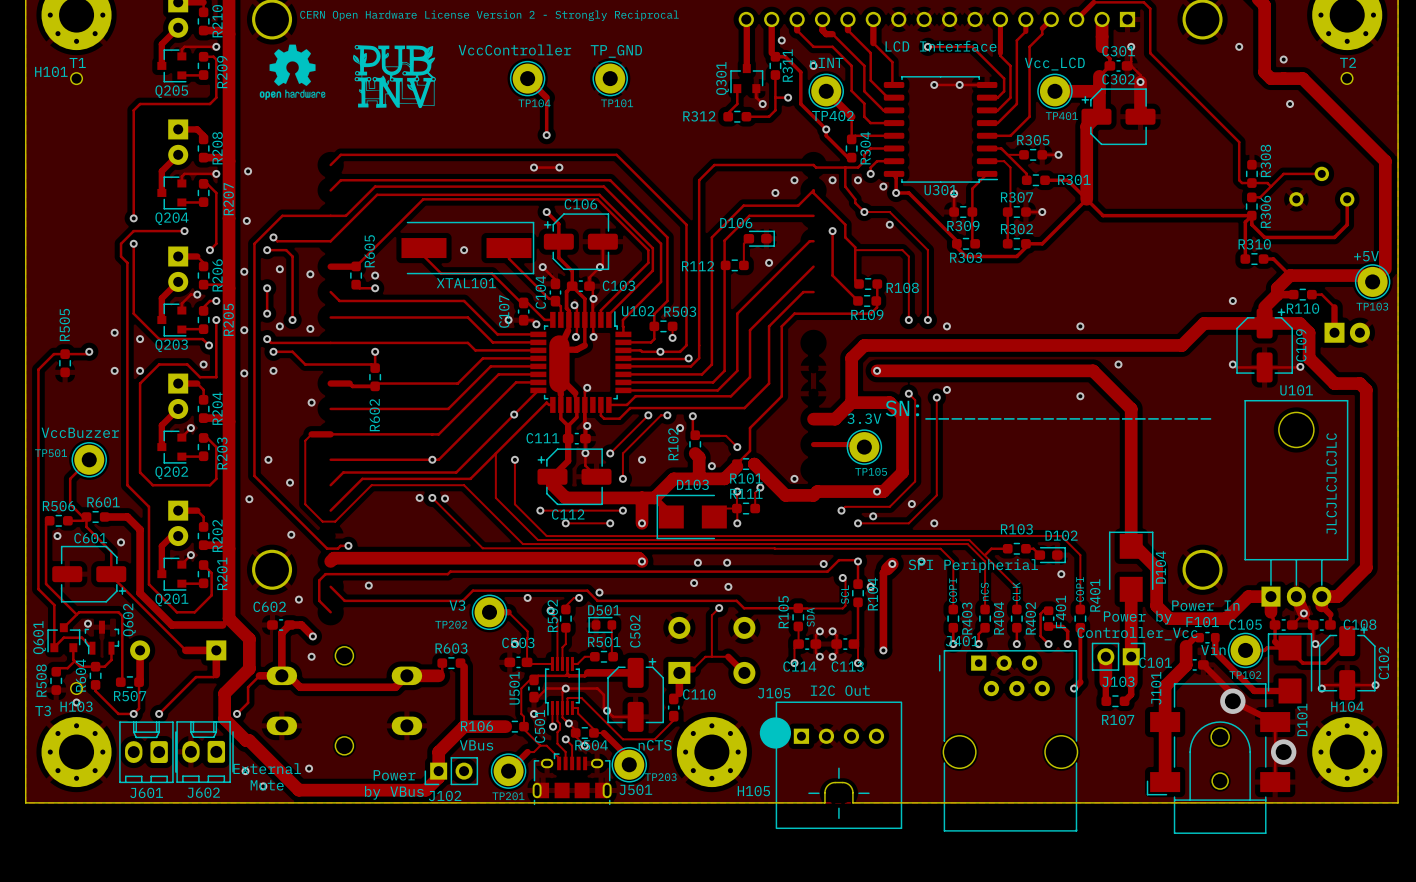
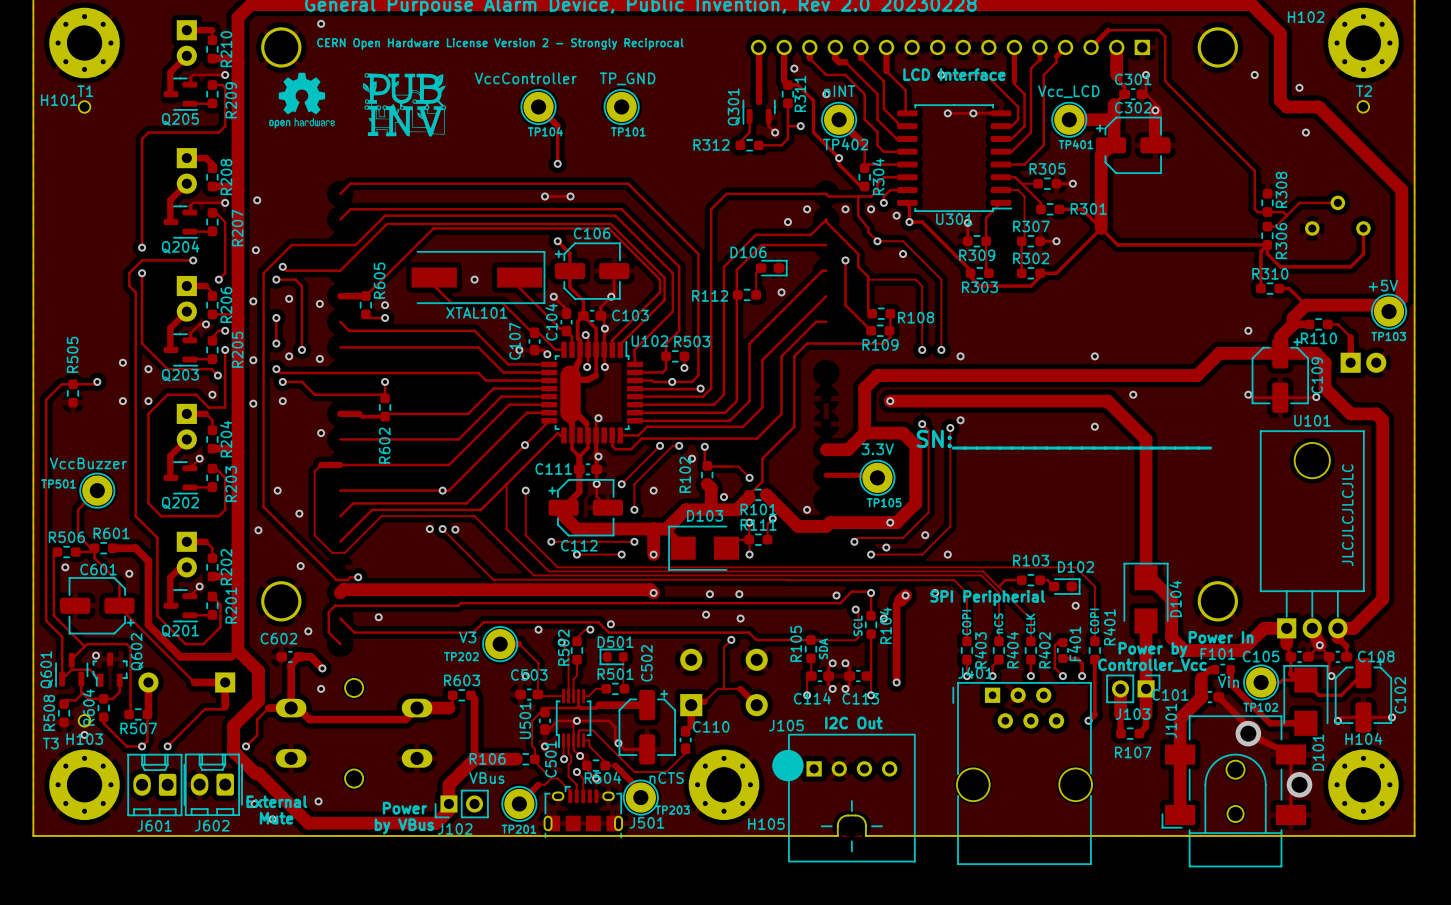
Q205 footprint: [157, 49, 187, 83] -> [163, 77, 198, 111]
Q301 footprint: [730, 64, 764, 94] -> [742, 90, 776, 125]
Q204 footprint: [157, 176, 187, 210] -> [163, 205, 198, 239]
Q203 footprint: [157, 303, 187, 337] -> [163, 333, 198, 367]
Q202 footprint: [157, 430, 187, 464] -> [163, 461, 198, 495]
Q201 footprint: [157, 557, 187, 591] -> [163, 589, 198, 623]
Q601 footprint: [47, 623, 81, 653] -> [55, 652, 89, 688]

